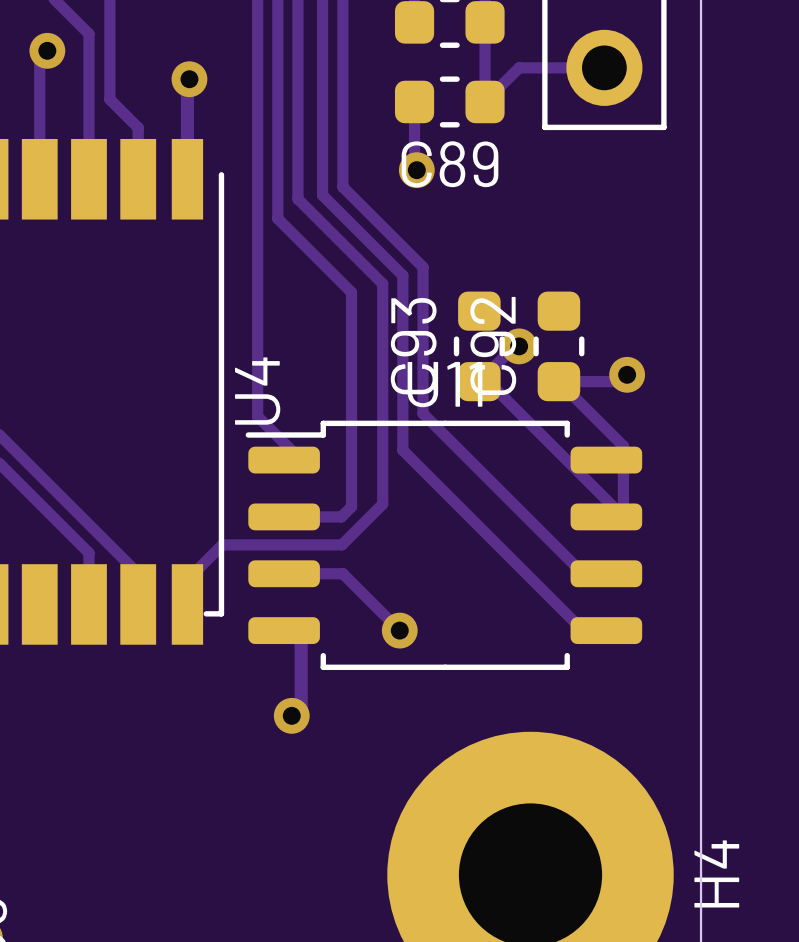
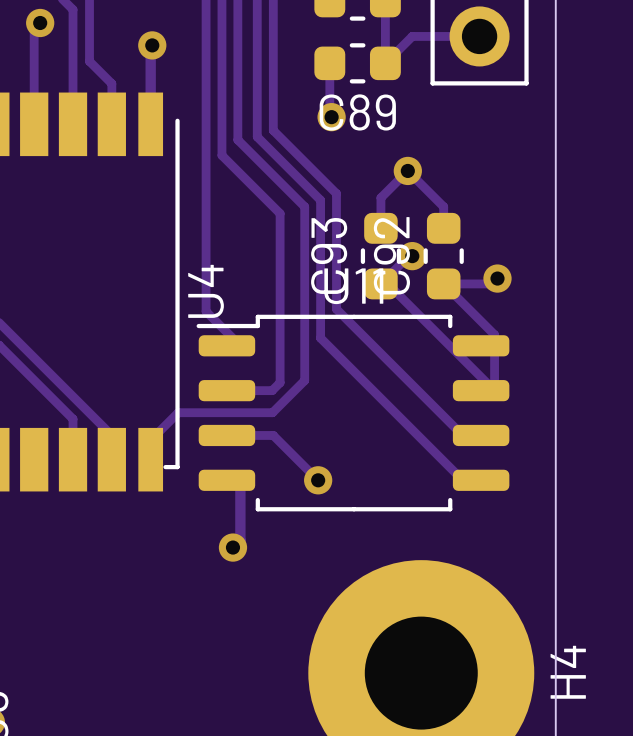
via: none -> (407, 170)
track: none -> (380, 228) (380, 197) (407, 170) (443, 206) (443, 228)

